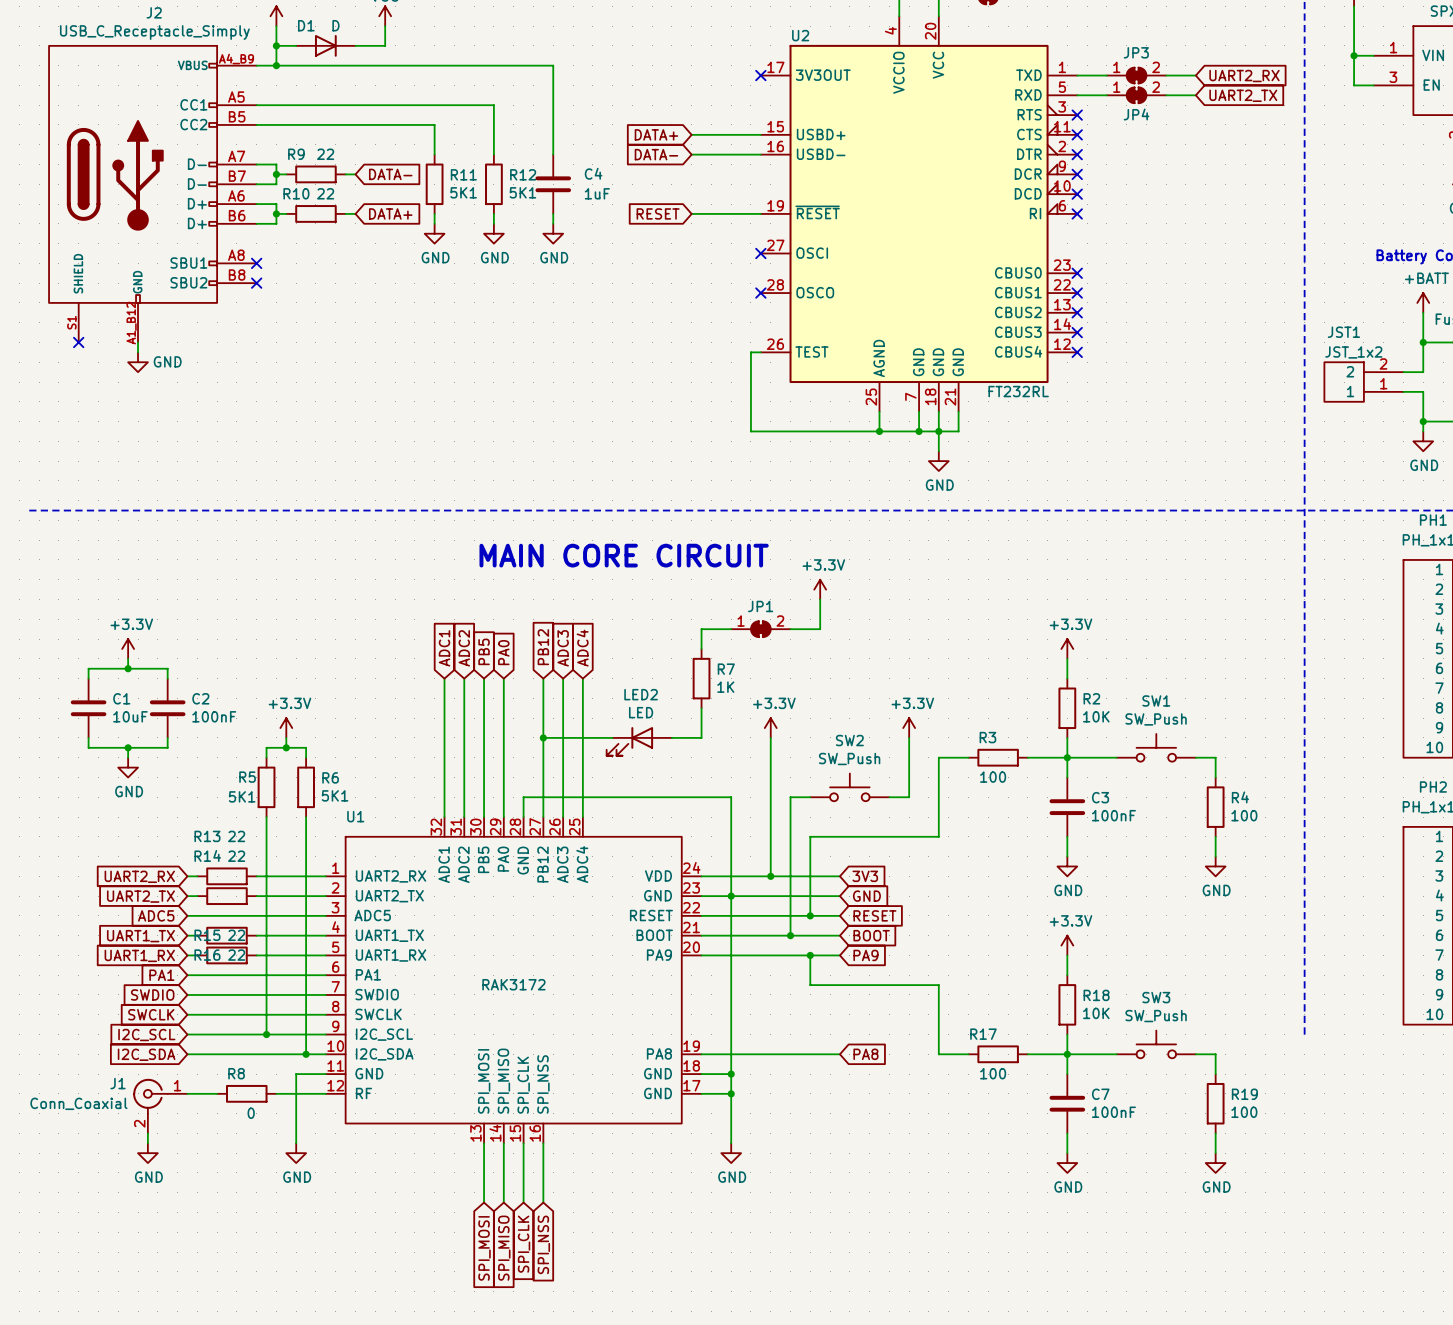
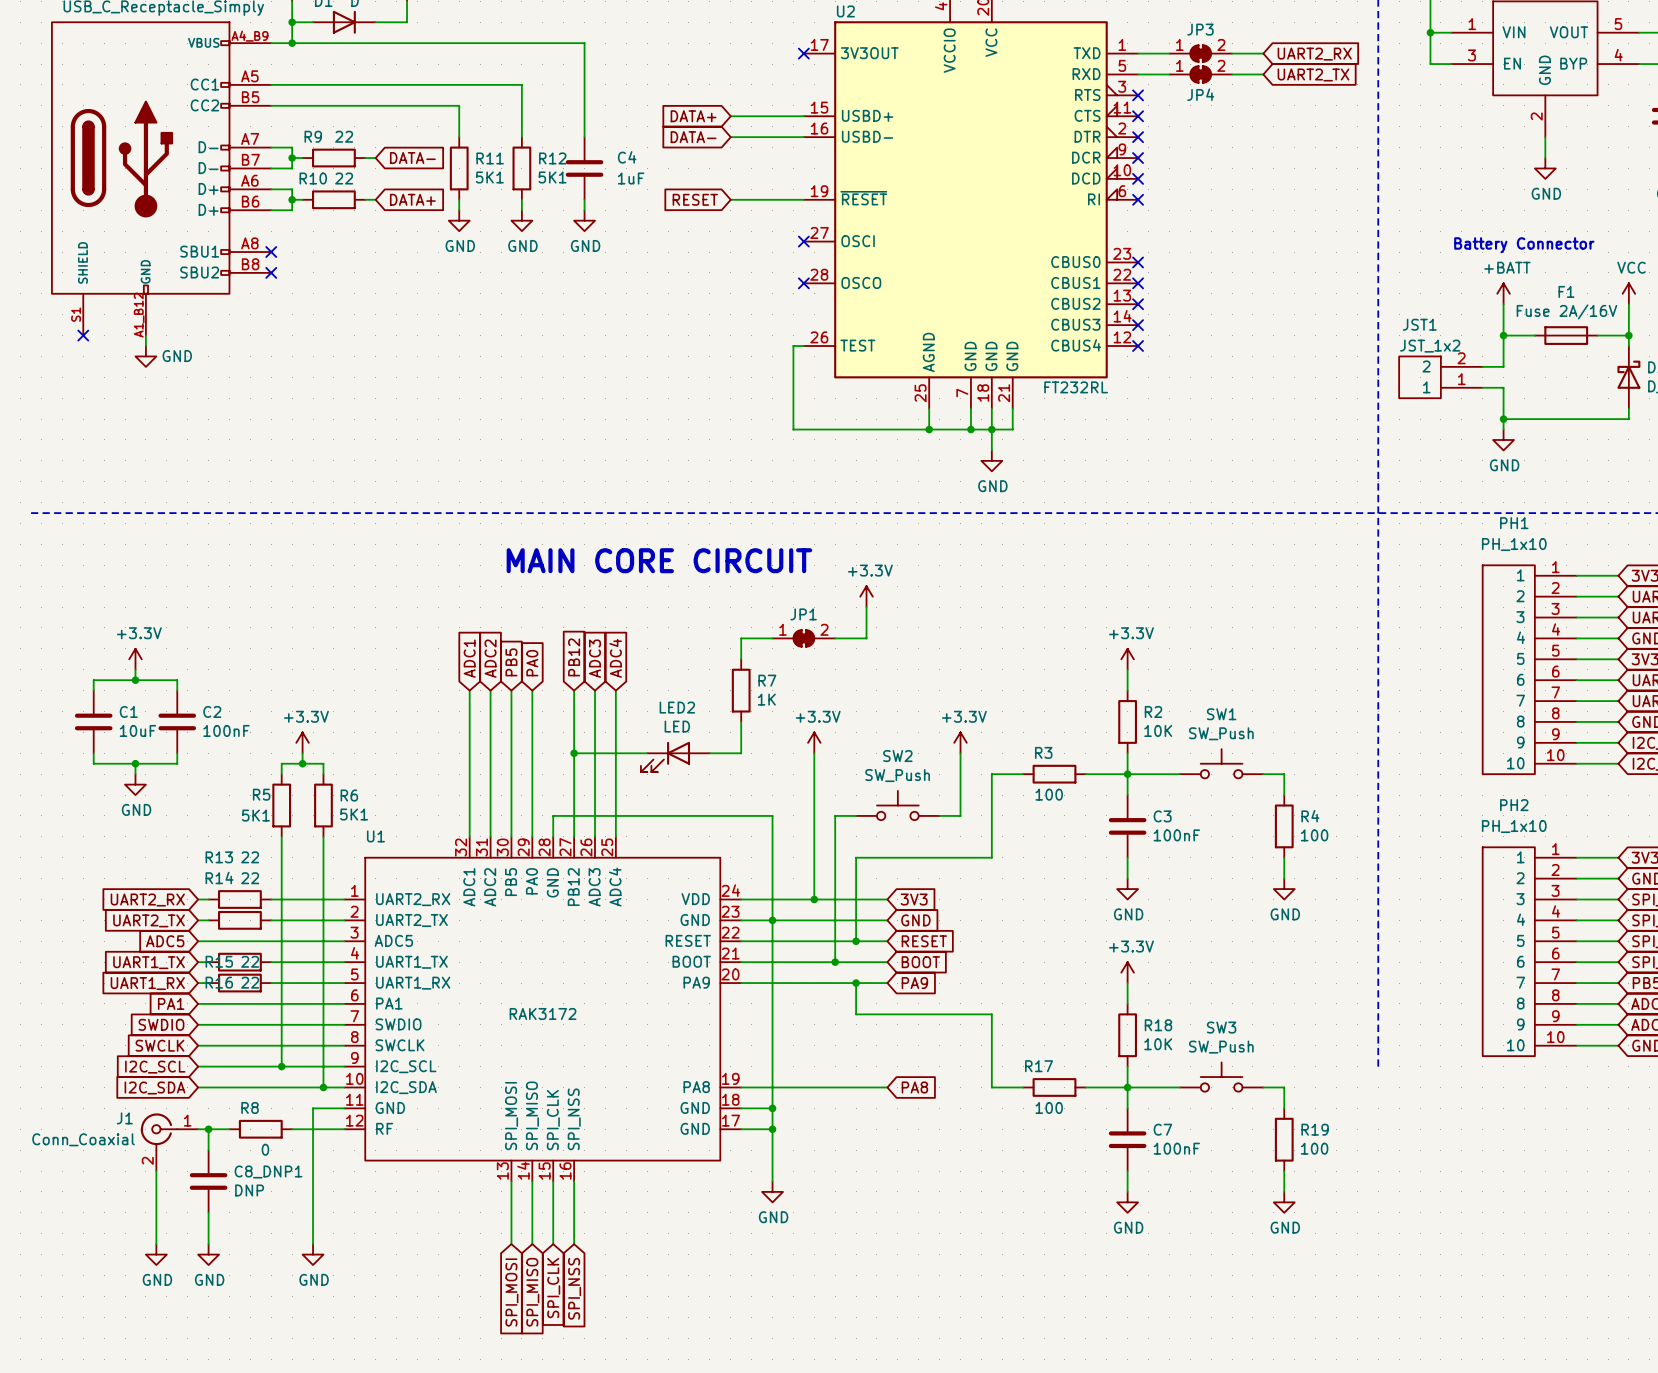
wire: none -> (208, 1129) (208, 1150)
junction: none -> (208, 1129)
wire: none -> (156, 1181) (156, 1244)
C8_DNP1: none -> DNP (208, 1181)
wire: none -> (313, 1181) (313, 1244)
power symbol: GND (147, 1153) -> none
power symbol: GND (296, 1153) -> none
wire: none -> (208, 1212) (208, 1244)
power symbol: none -> GND (156, 1254)
power symbol: none -> GND (208, 1254)
power symbol: none -> GND (313, 1254)

